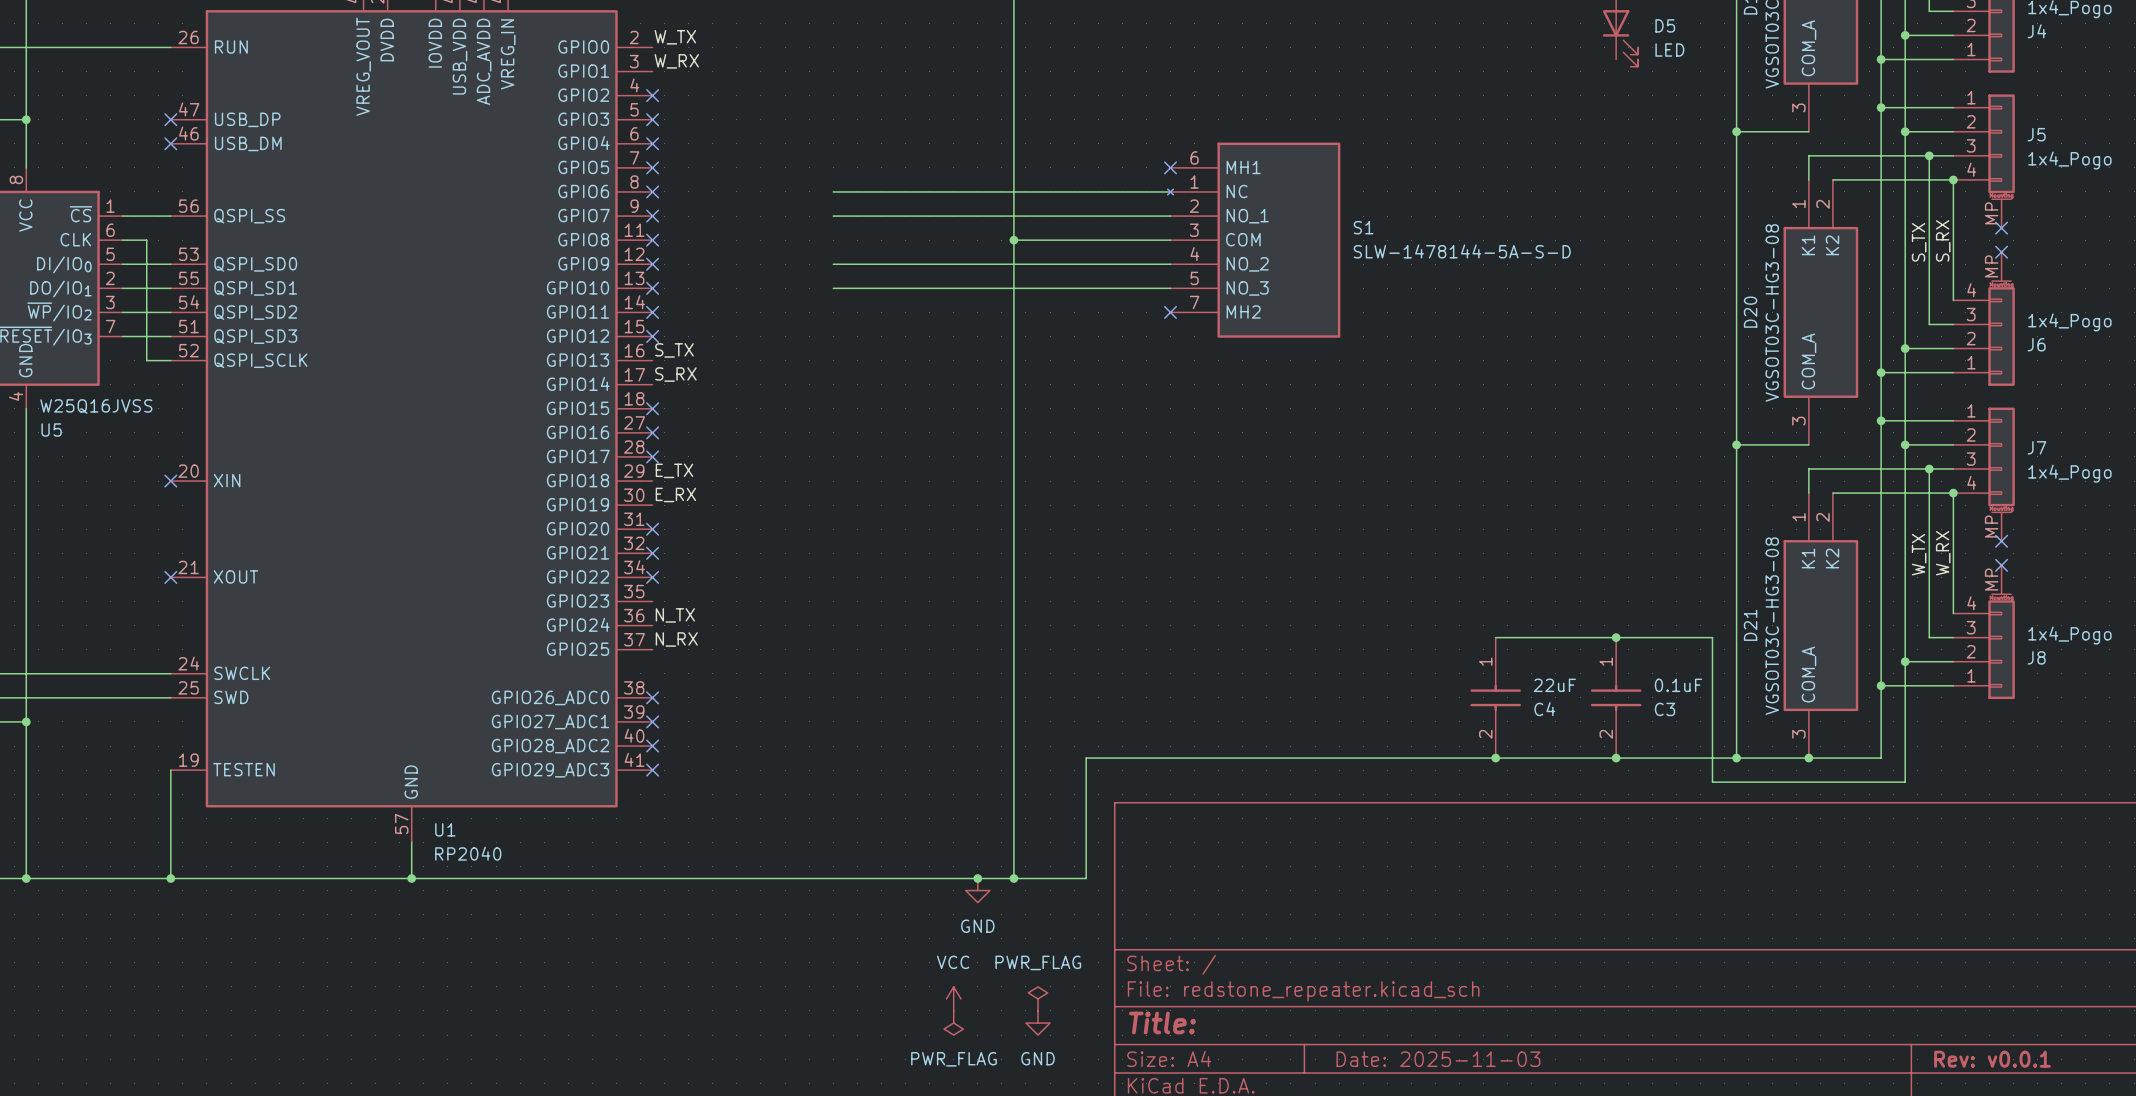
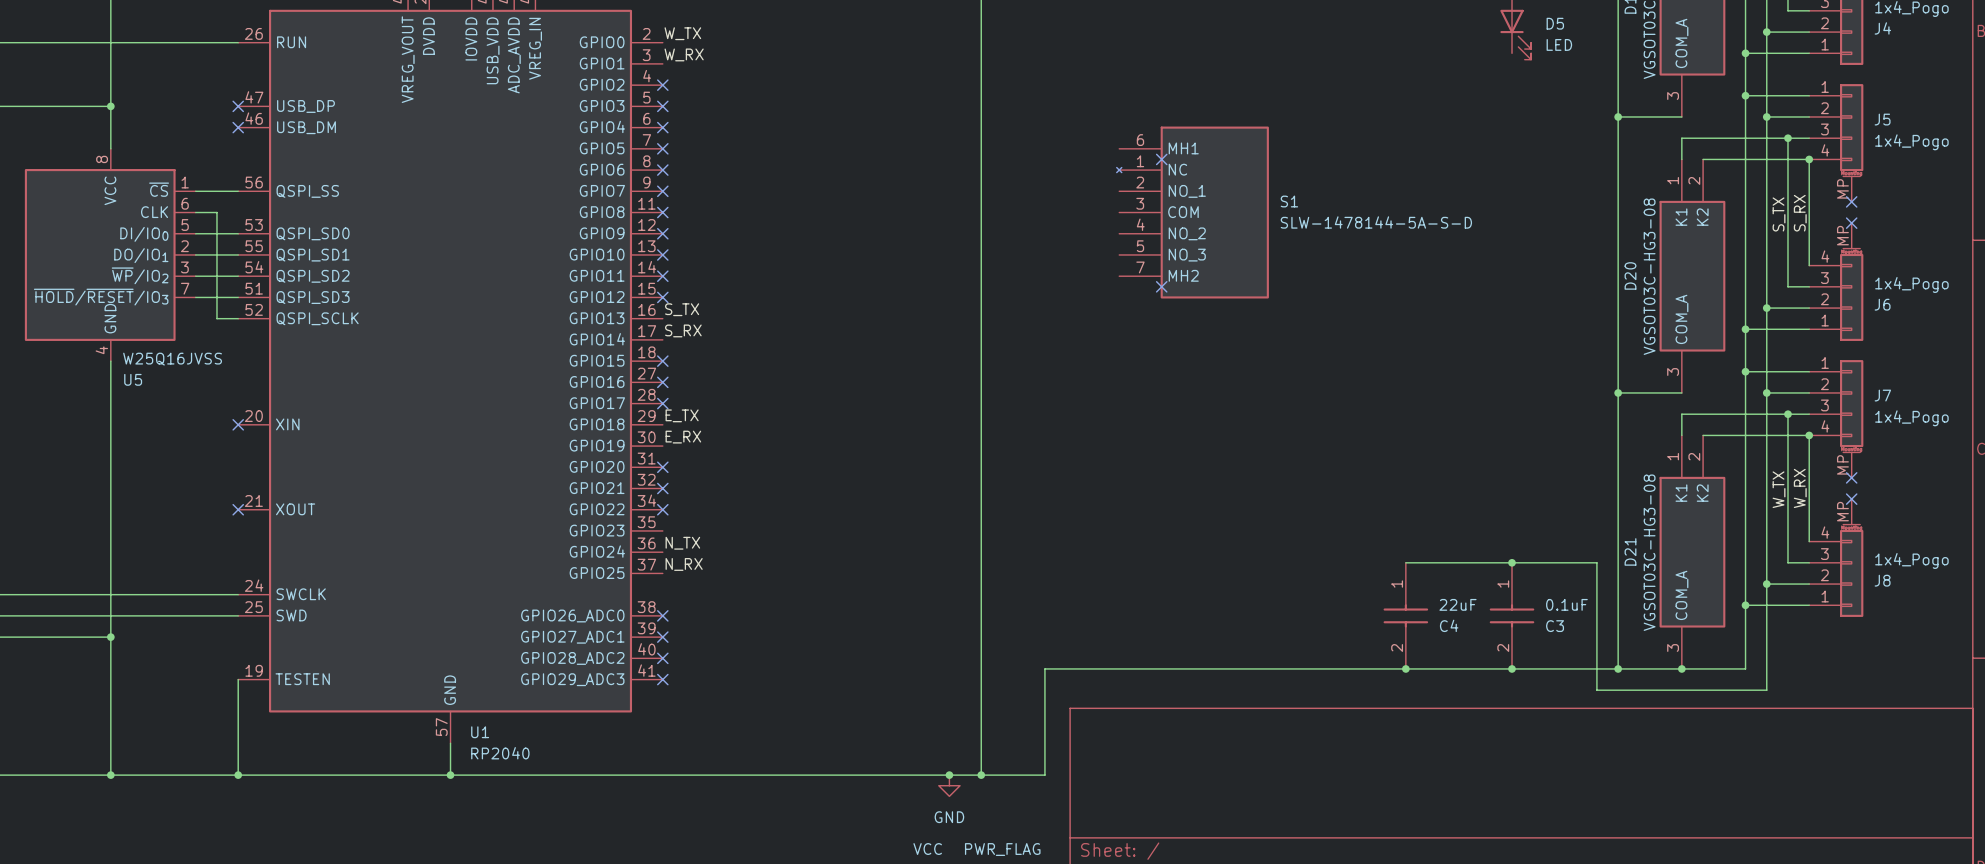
no-connect mark position: (1170, 167) -> (1161, 159)
wire: (833, 191) (1170, 191) -> none
wire: (833, 216) (1170, 216) -> none
wire: (1013, 240) (1170, 240) -> none
junction: (1013, 240) -> none
wire: (833, 264) (1170, 264) -> none
wire: (833, 288) (1170, 288) -> none
no-connect mark position: (1170, 312) -> (1161, 286)

